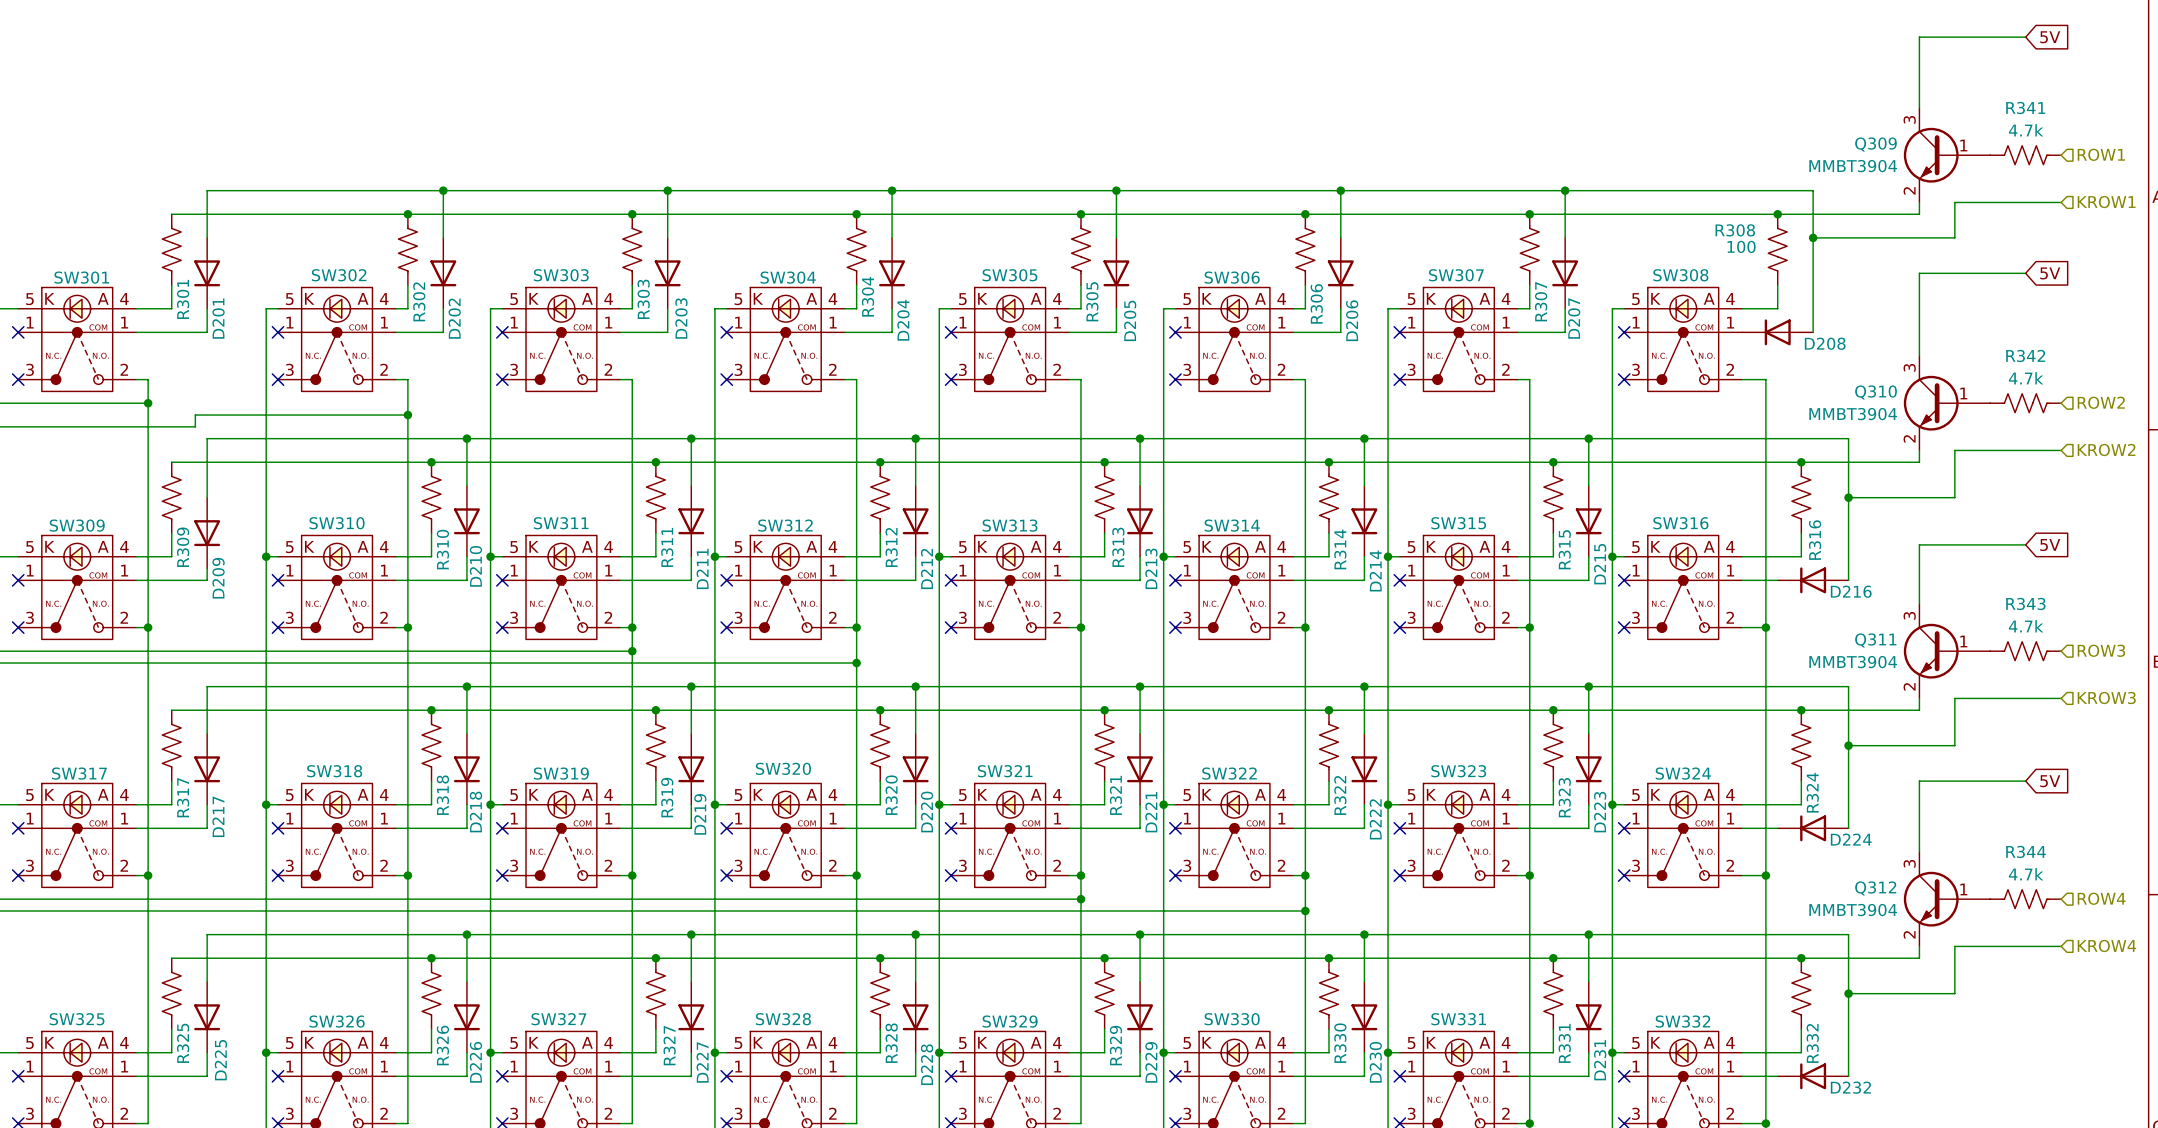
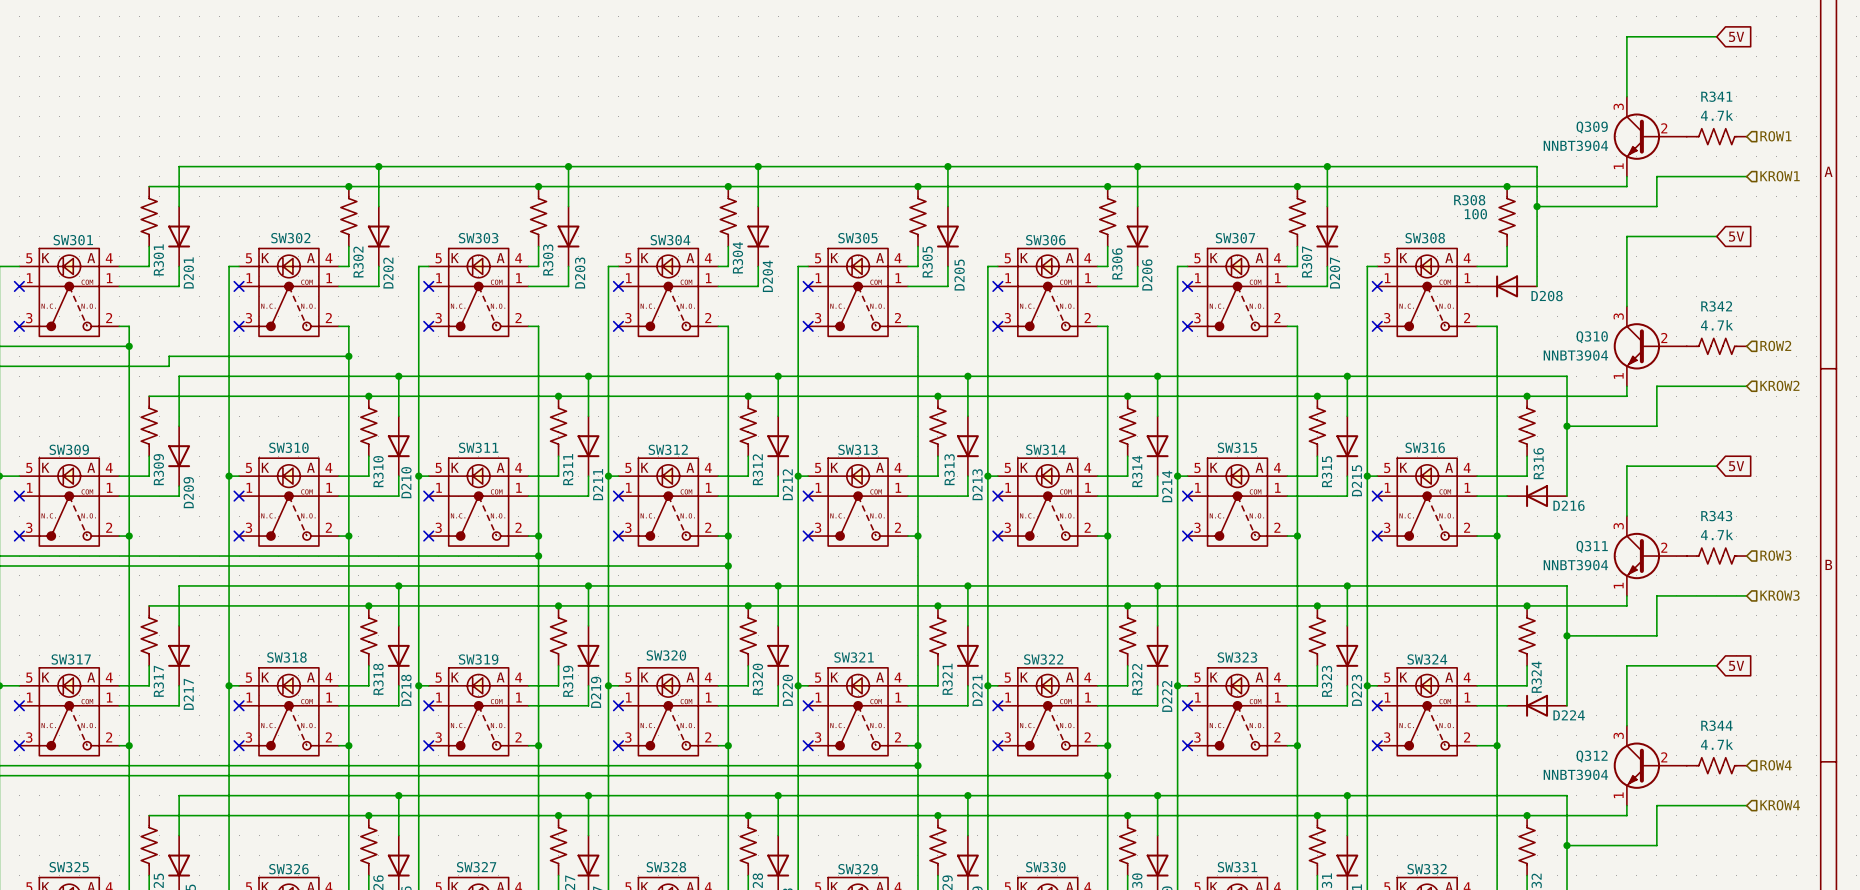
Q309 pin number: 1 (1963, 145) -> 2 (1664, 128)
Q309 value: MMBT3904 (1853, 166) -> NNBT3904 (1575, 145)
Q309 pin number: 2 (1909, 190) -> 1 (1618, 166)
Q310 pin number: 1 (1963, 393) -> 2 (1664, 338)
Q310 value: MMBT3904 (1853, 414) -> NNBT3904 (1575, 355)
Q310 pin number: 2 (1909, 438) -> 1 (1618, 375)
Q311 pin number: 1 (1963, 641) -> 2 (1664, 547)
Q311 value: MMBT3904 (1853, 662) -> NNBT3904 (1575, 565)
Q311 pin number: 2 (1909, 686) -> 1 (1618, 585)
Q312 pin number: 1 (1963, 889) -> 2 (1664, 757)
Q312 value: MMBT3904 (1853, 910) -> NNBT3904 (1575, 774)
Q312 pin number: 2 (1909, 934) -> 1 (1618, 795)

